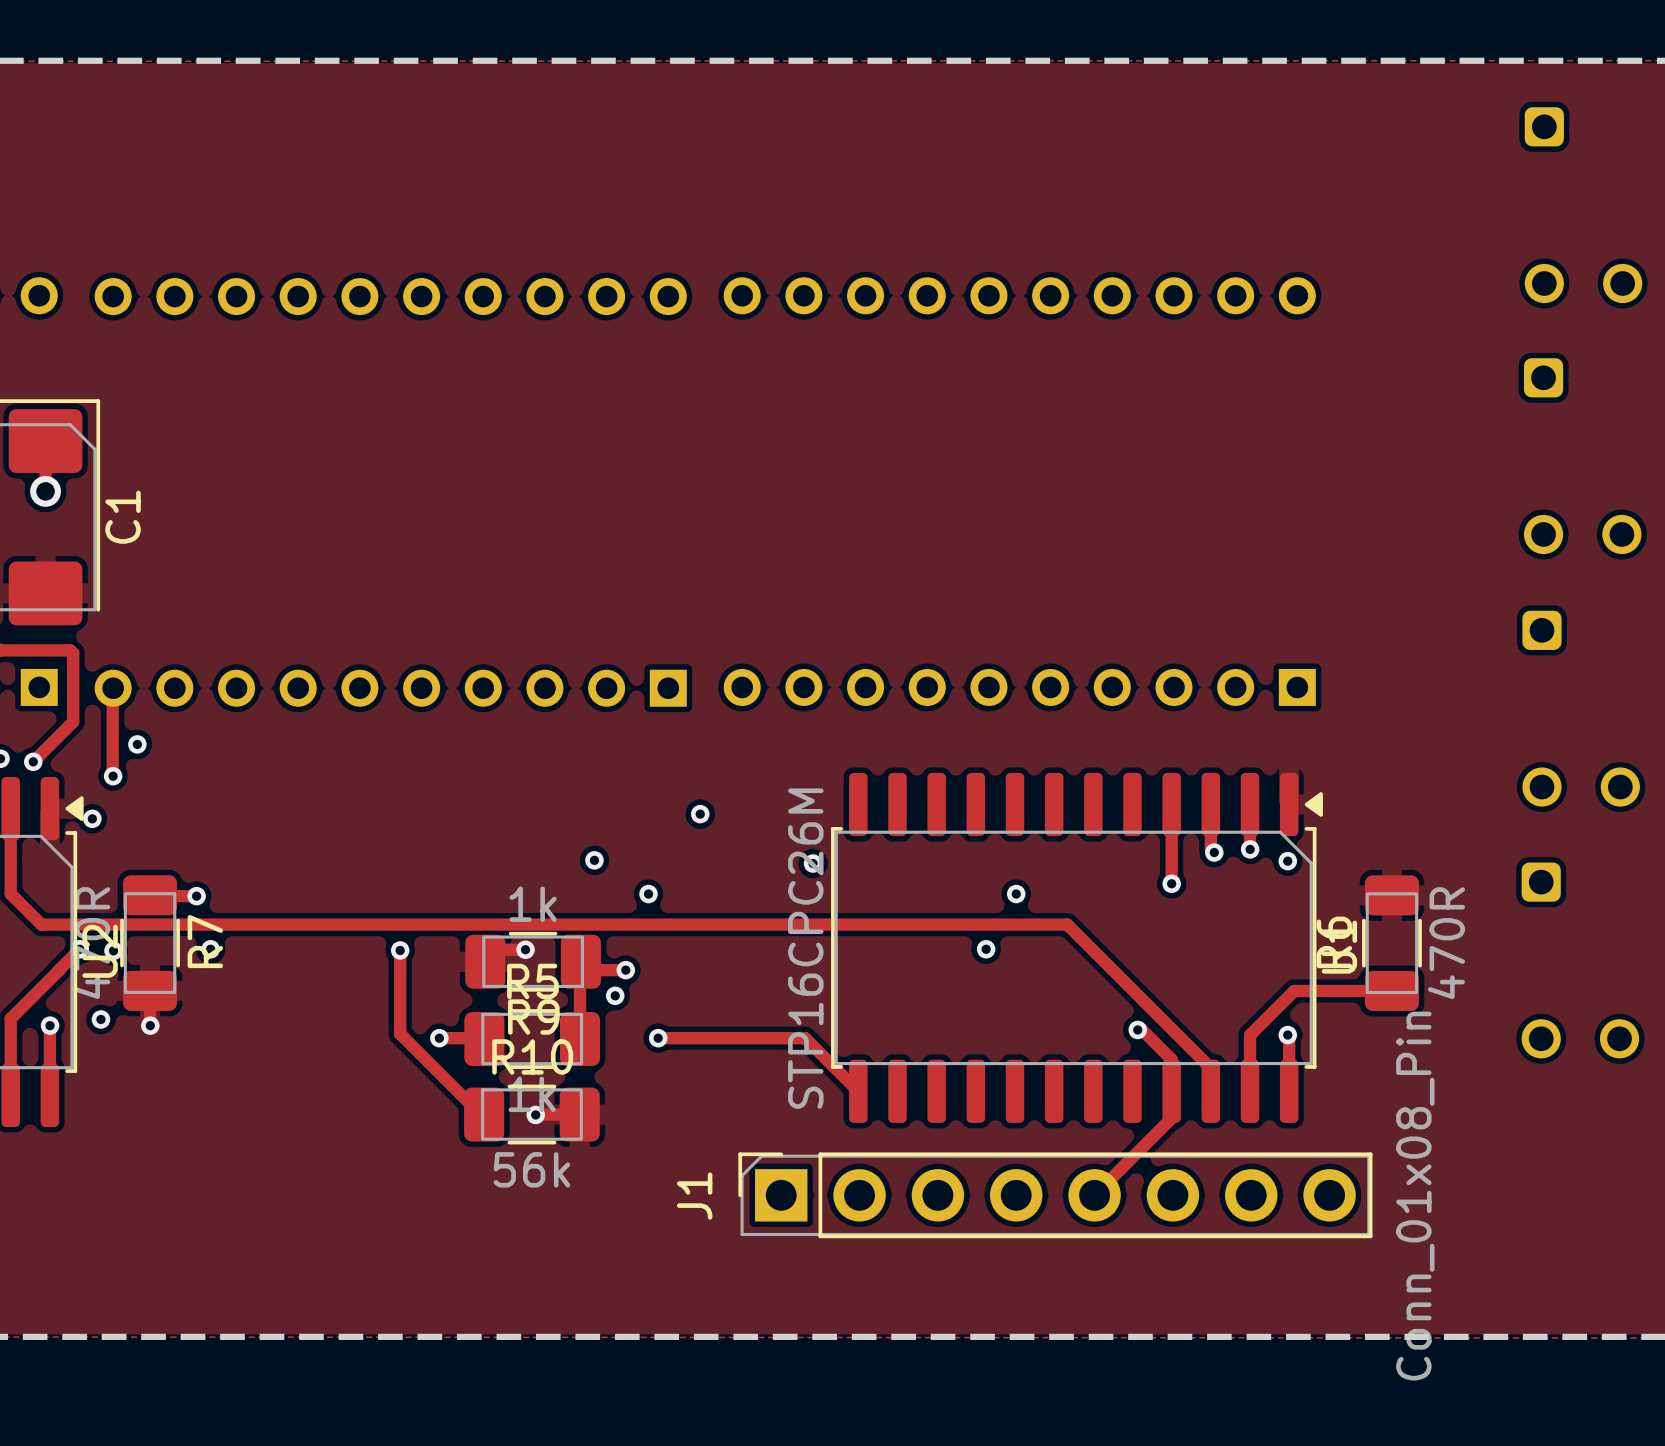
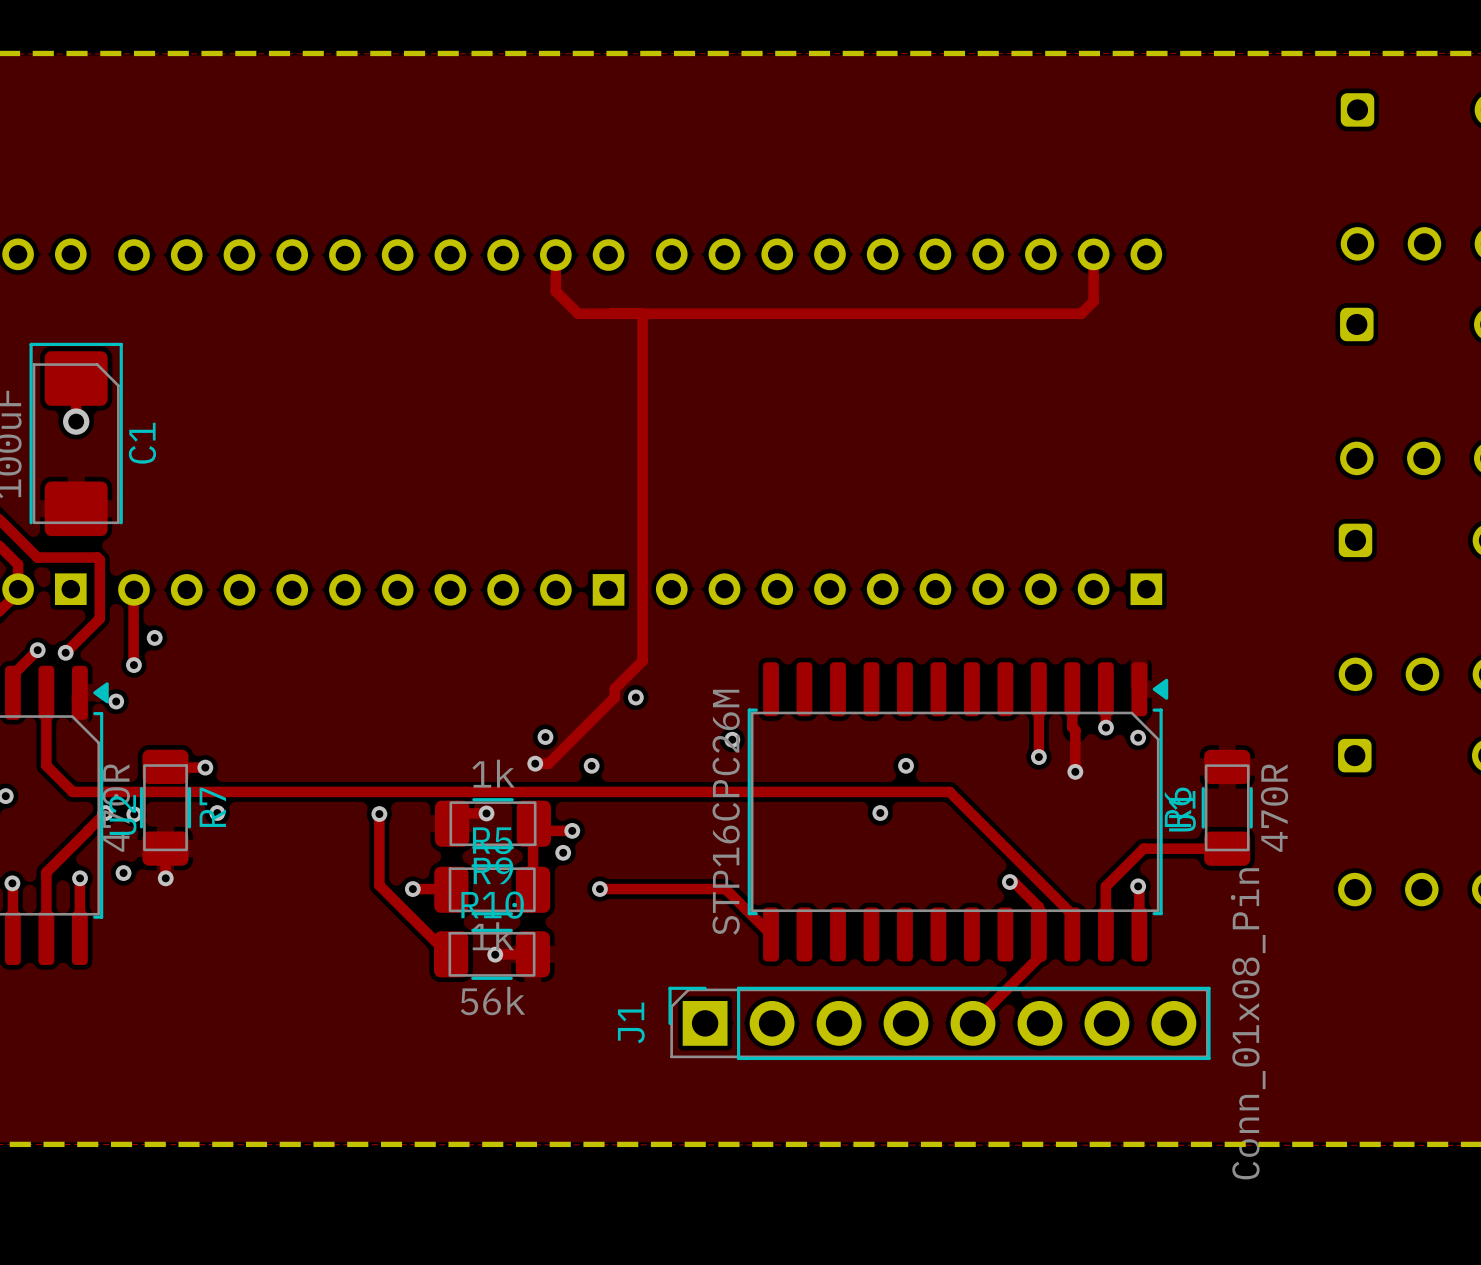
track: none -> (1093, 254) (1093, 301) (1081, 313) (578, 313) (555, 291) (555, 255)
track: none -> (642, 313) (642, 660) (614, 688) (614, 697) (548, 763) (535, 763)
track: none -> (1075, 730) (1075, 771)
via position: (1214, 852) -> (1075, 771)
via: none -> (535, 763)

